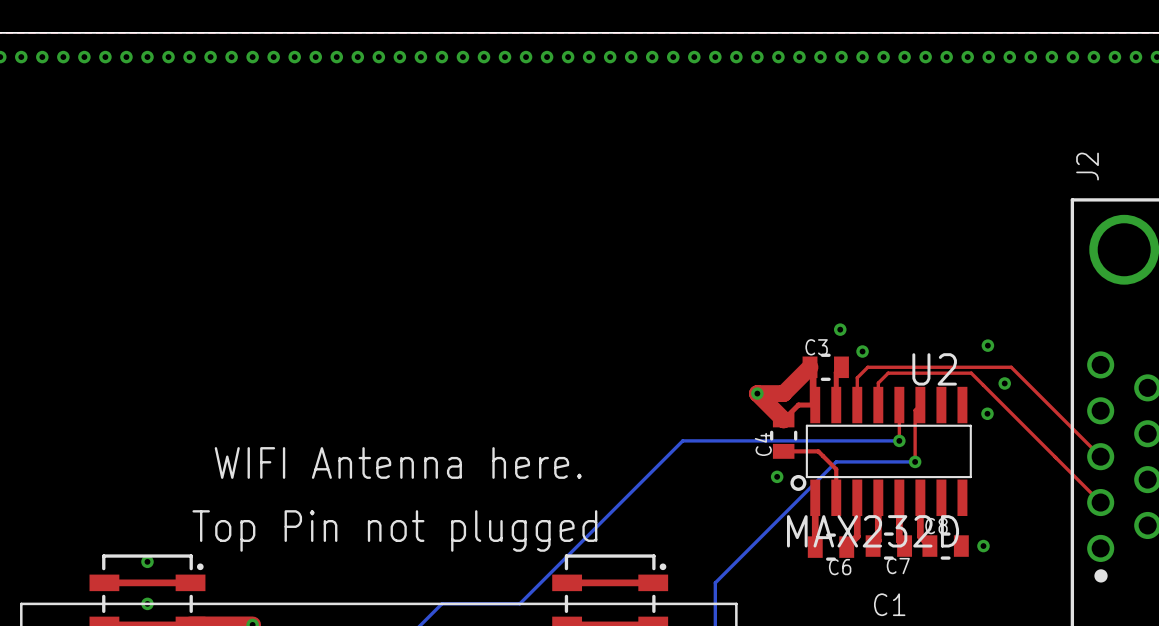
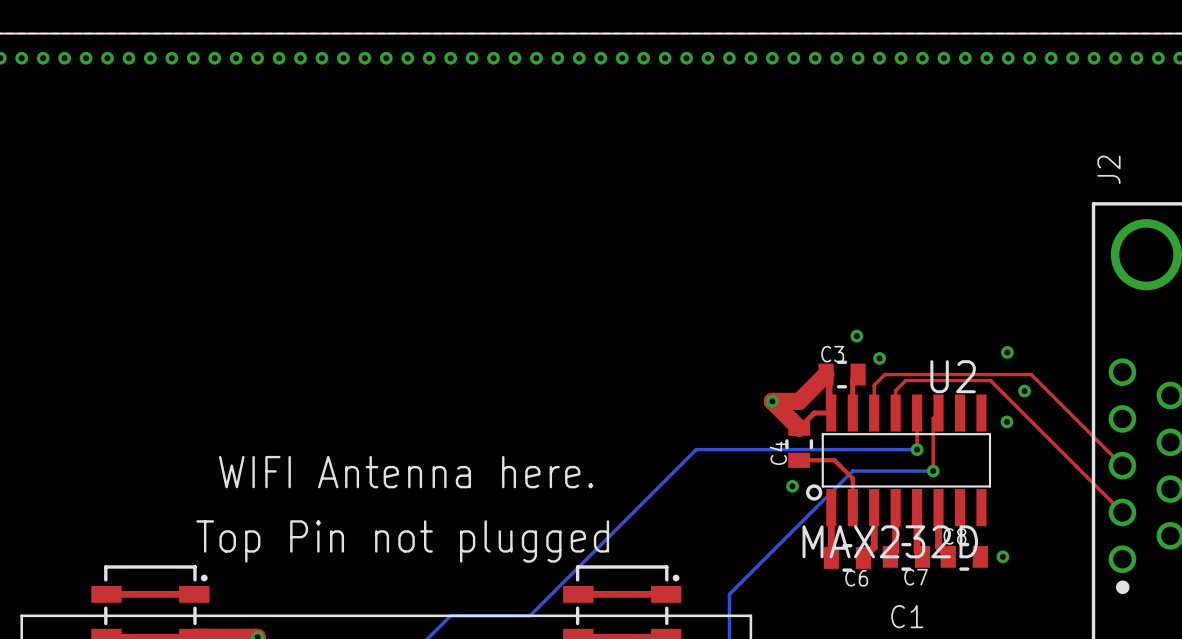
via: (147, 561) -> none
via: (147, 603) -> none

